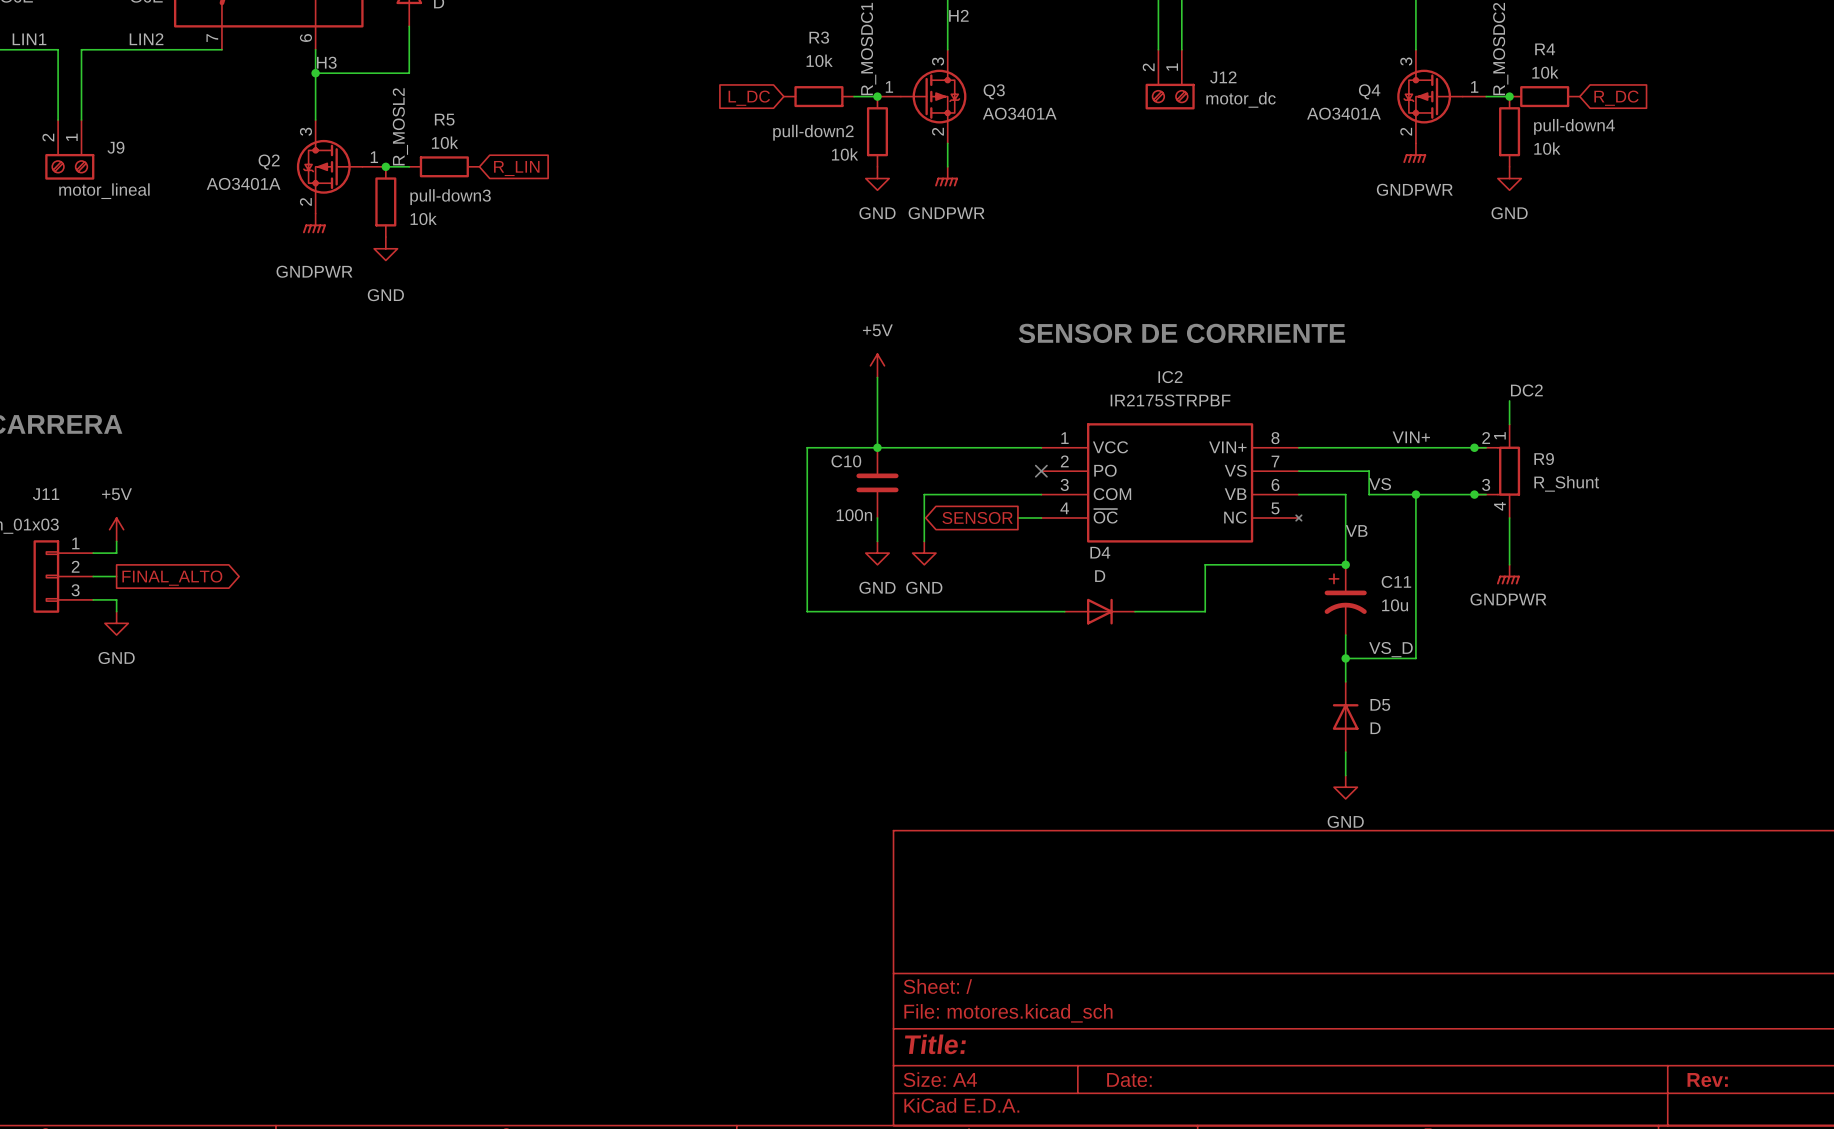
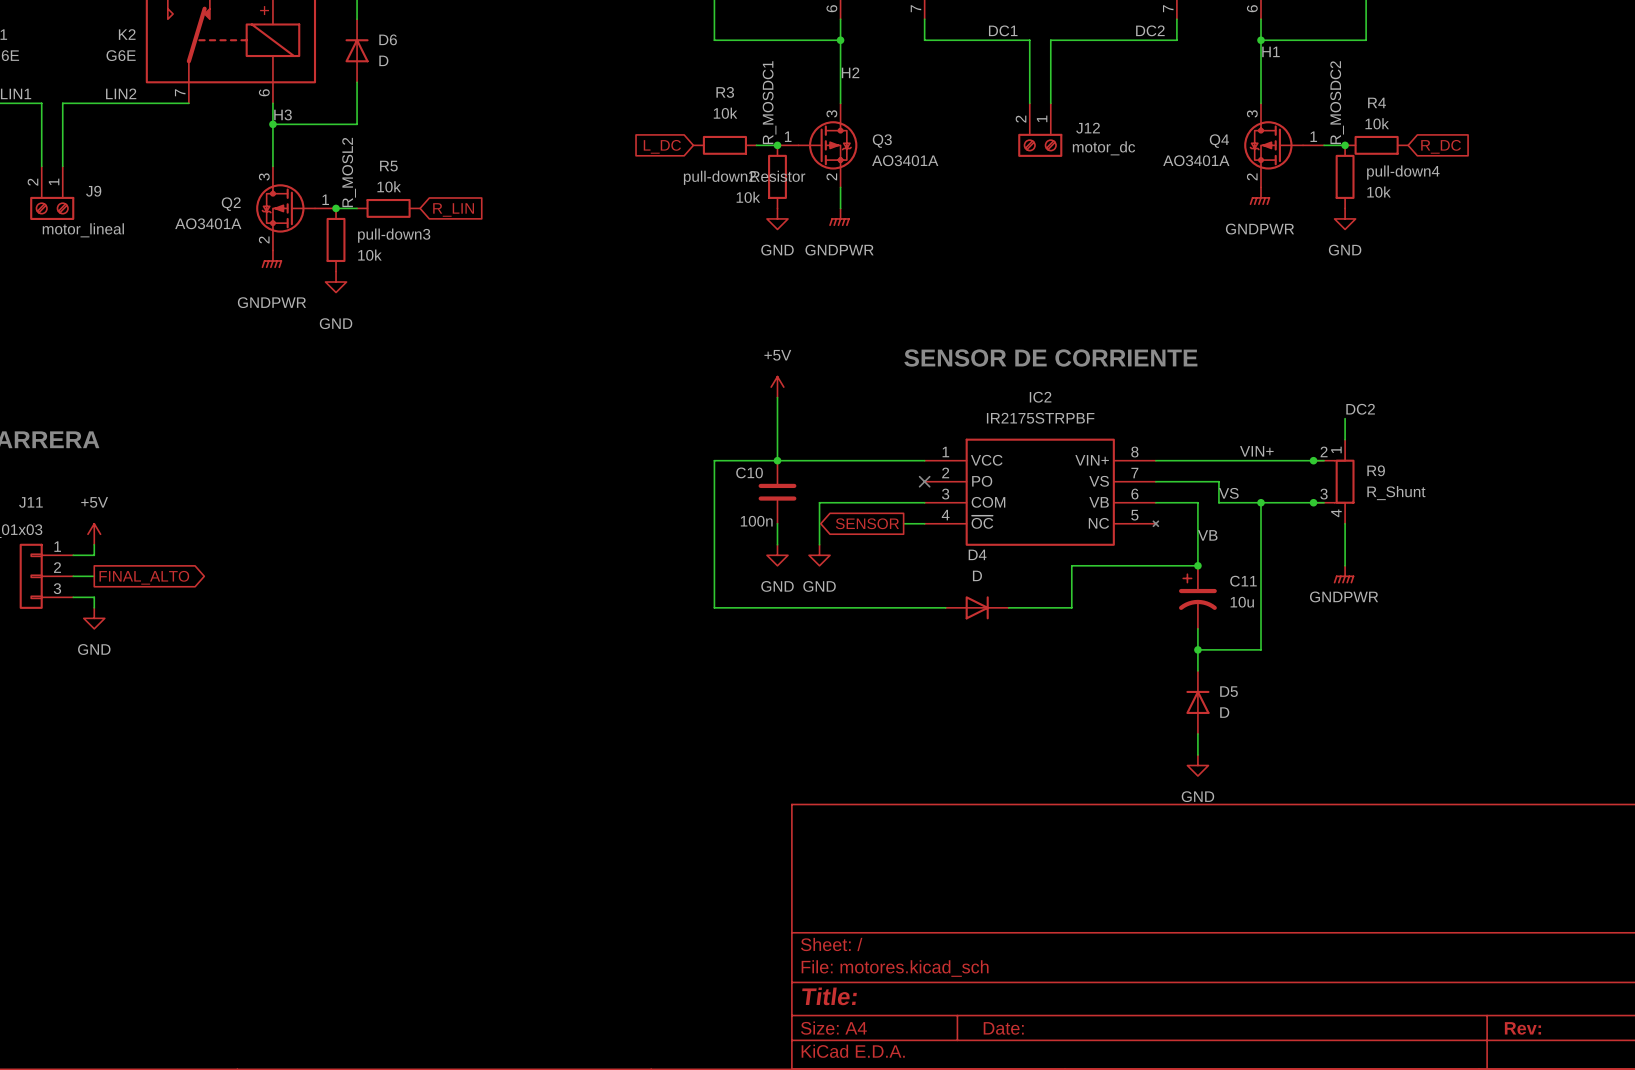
pull-down2 text: none -> Resistor (777, 176)
label: VS_D (1390, 649) -> none

